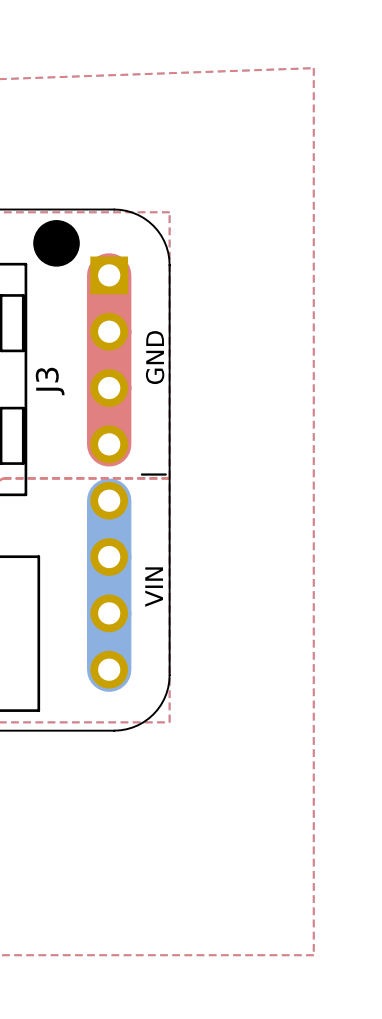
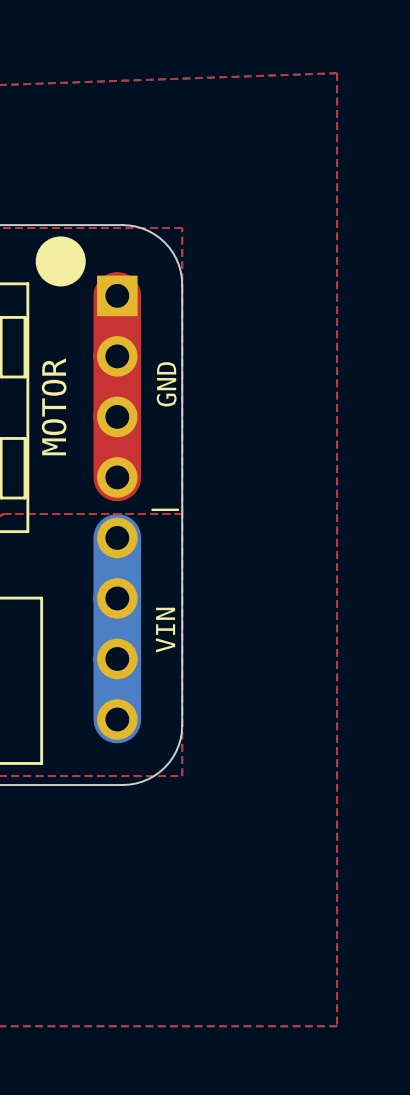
text: none -> MOTOR (54, 406)
J3 name: J3 (50, 381) -> none

